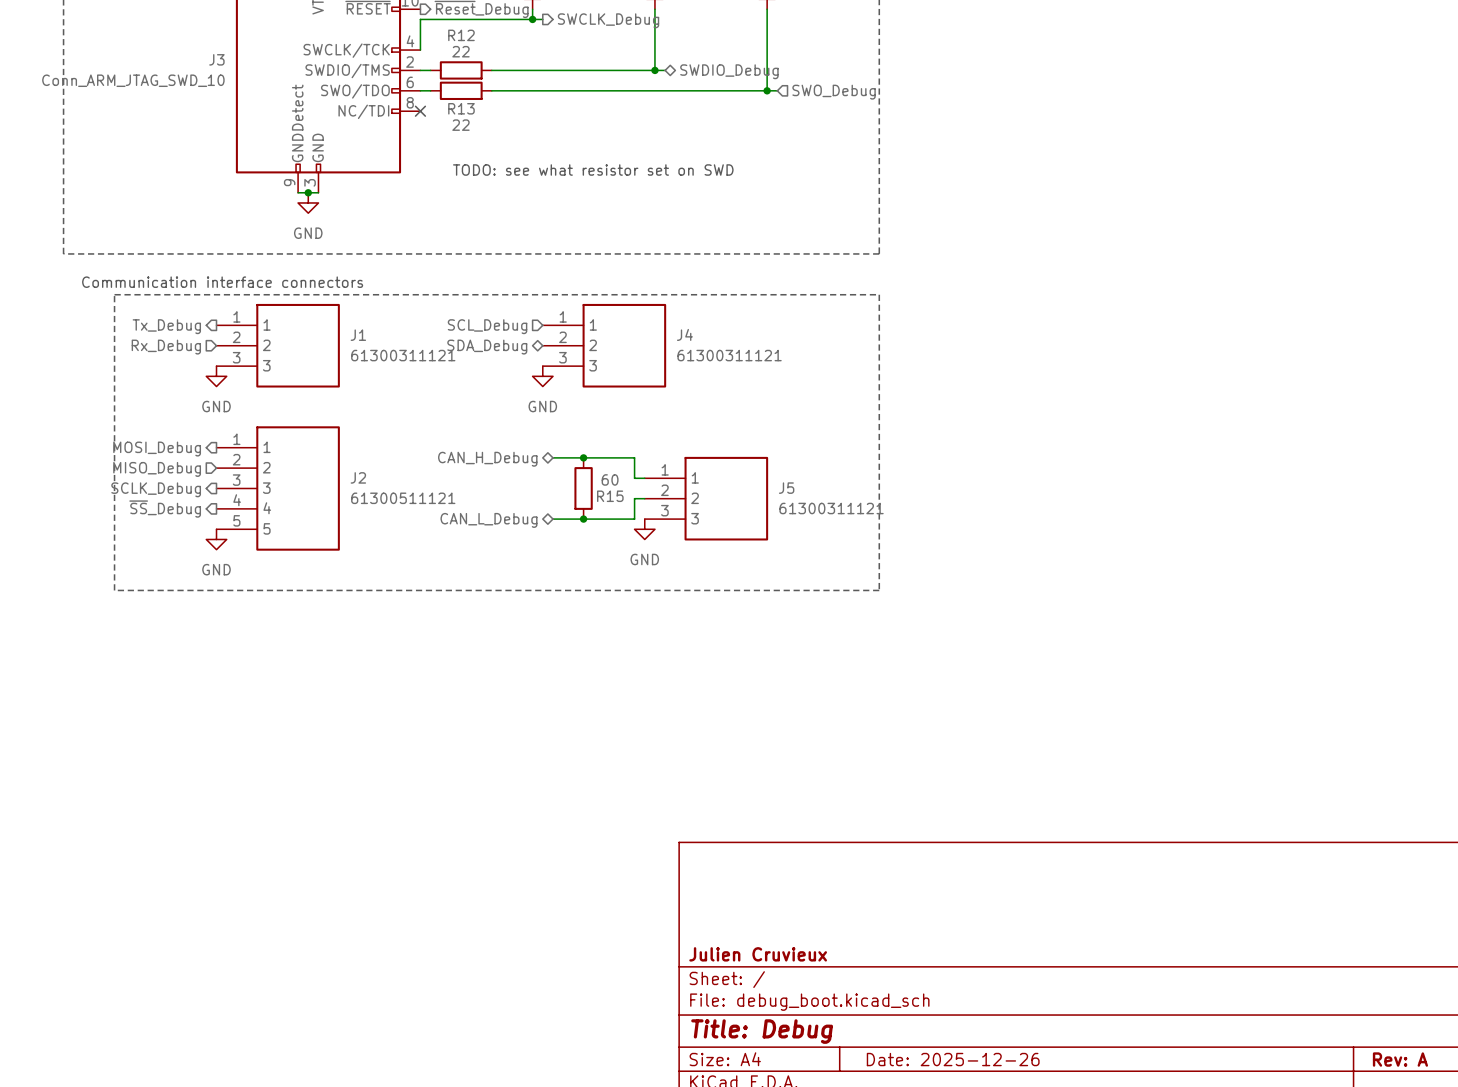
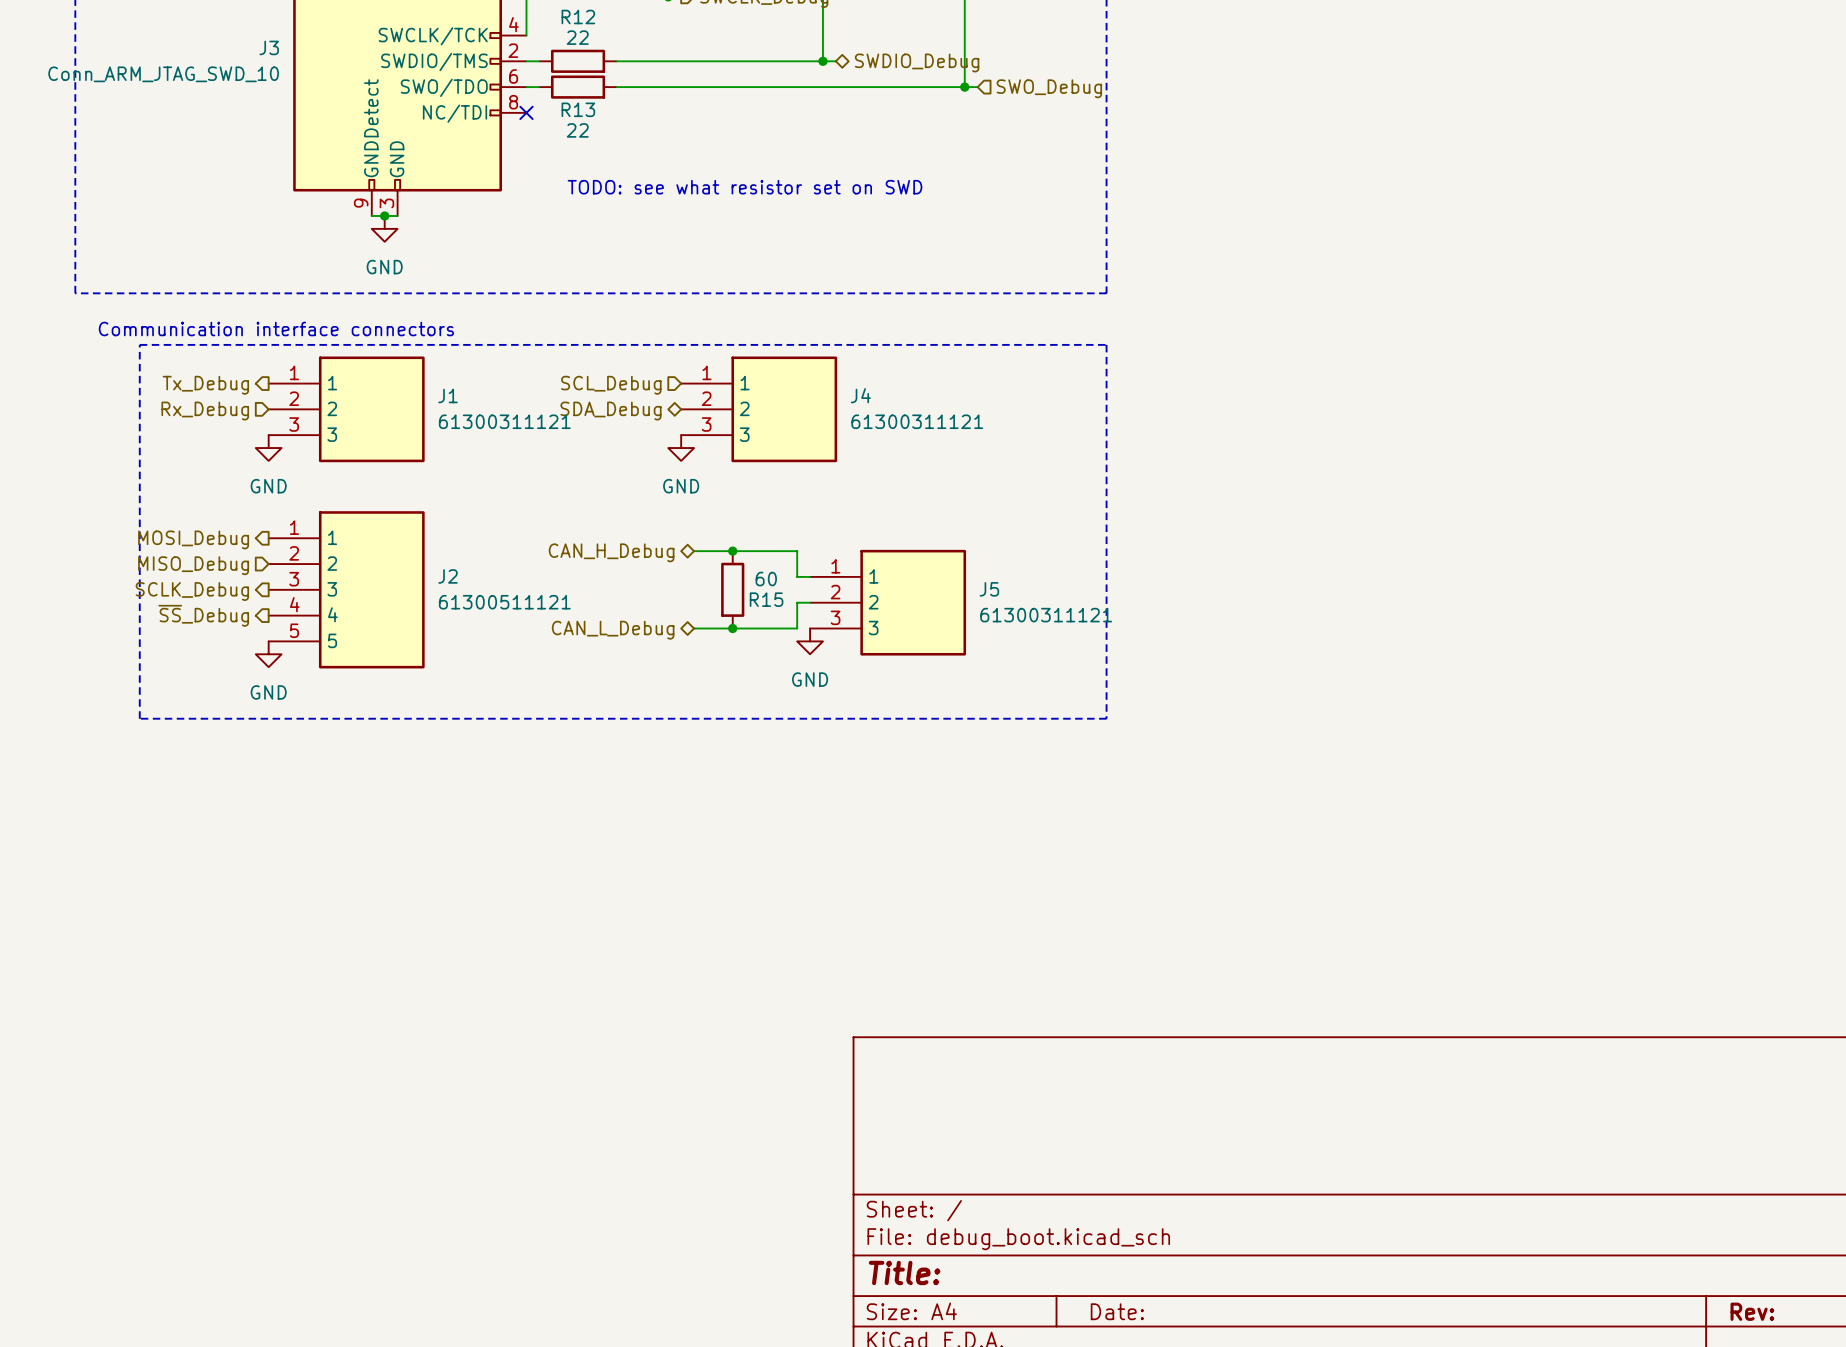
title block: Julien Cruvieux (758, 954) -> none
title block: Title: Debug (762, 1031) -> Title: (904, 1272)
title block: Date: 2025-12-26 (953, 1059) -> Date: (1117, 1311)
title block: Rev: A (1400, 1059) -> Rev: (1752, 1311)

